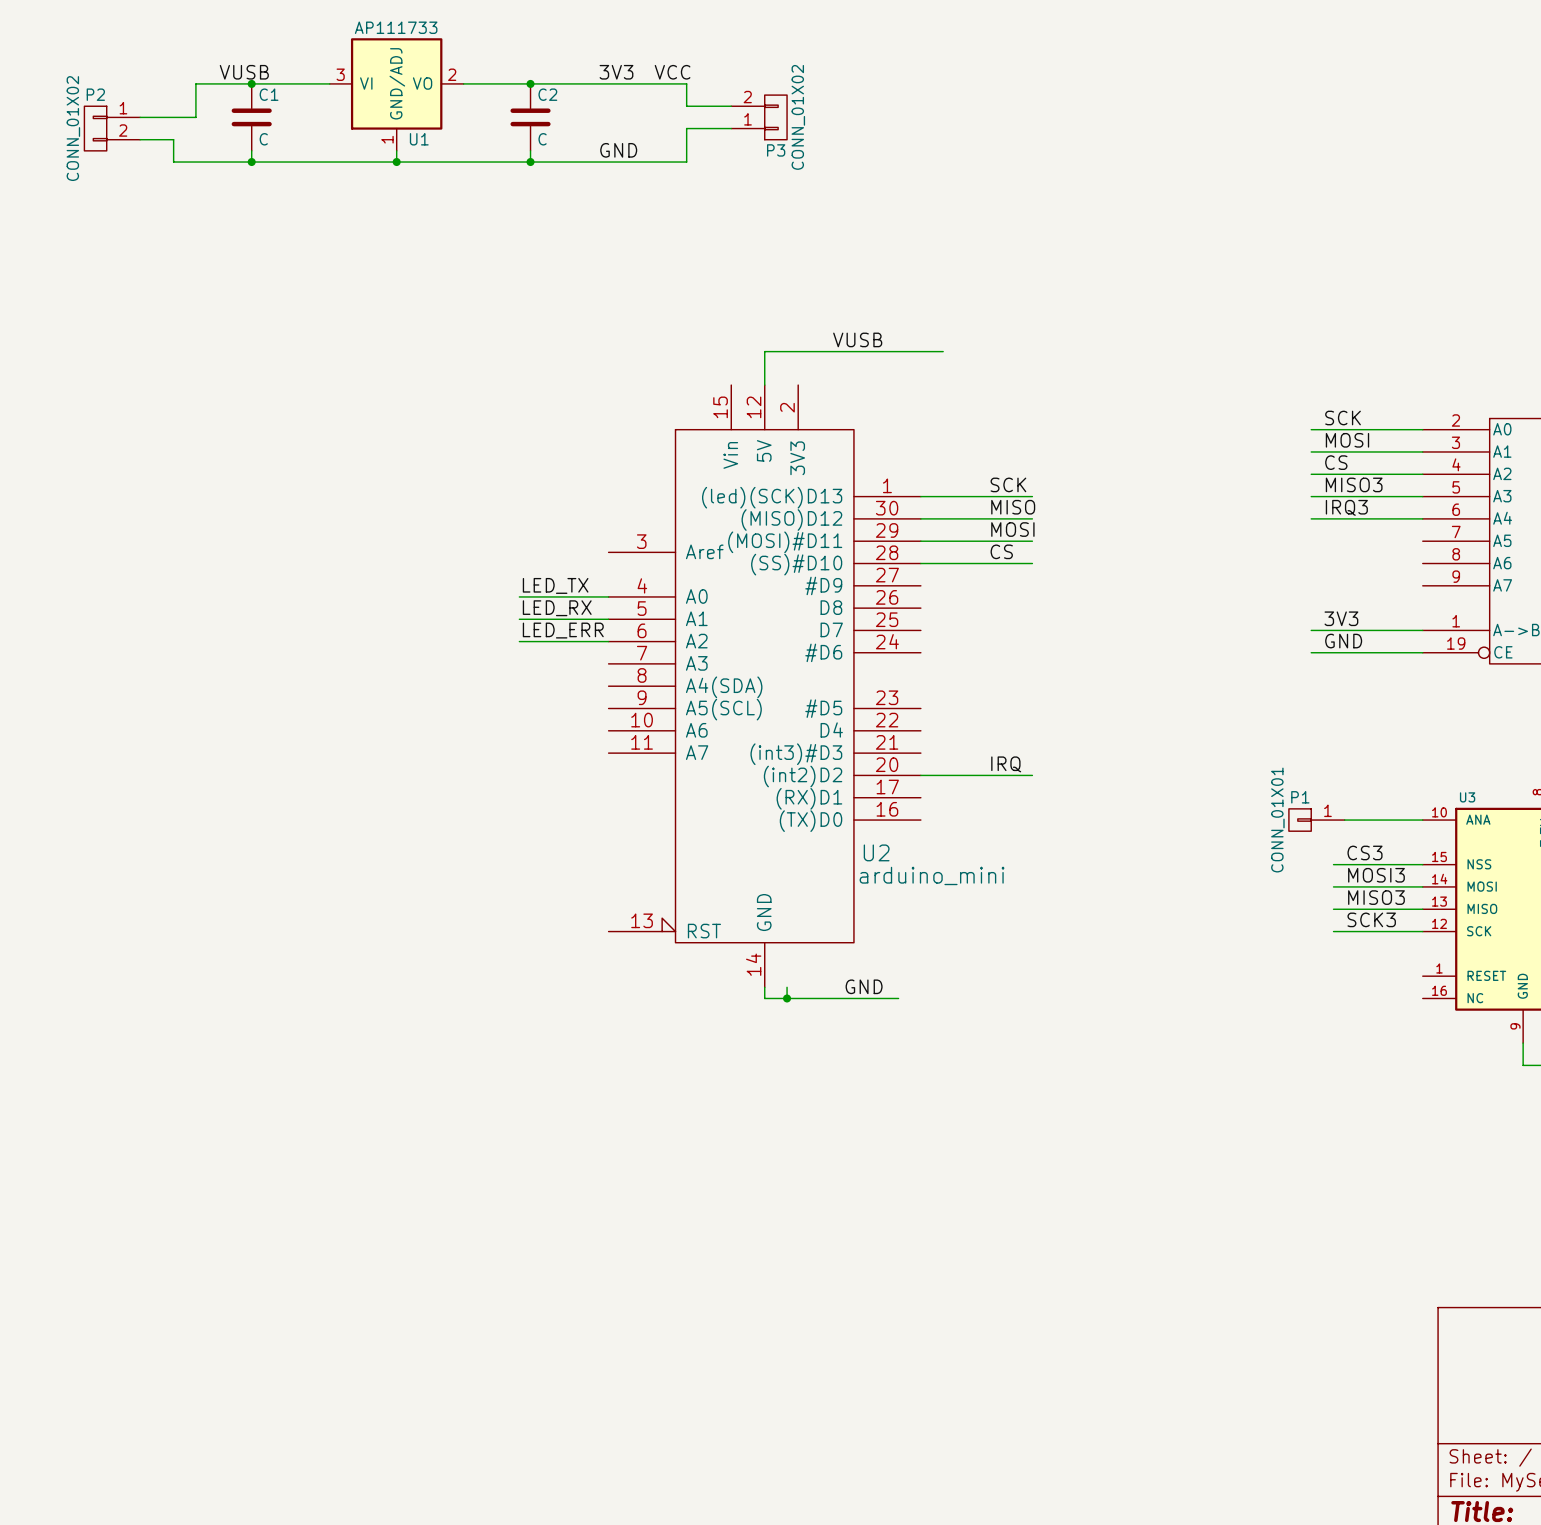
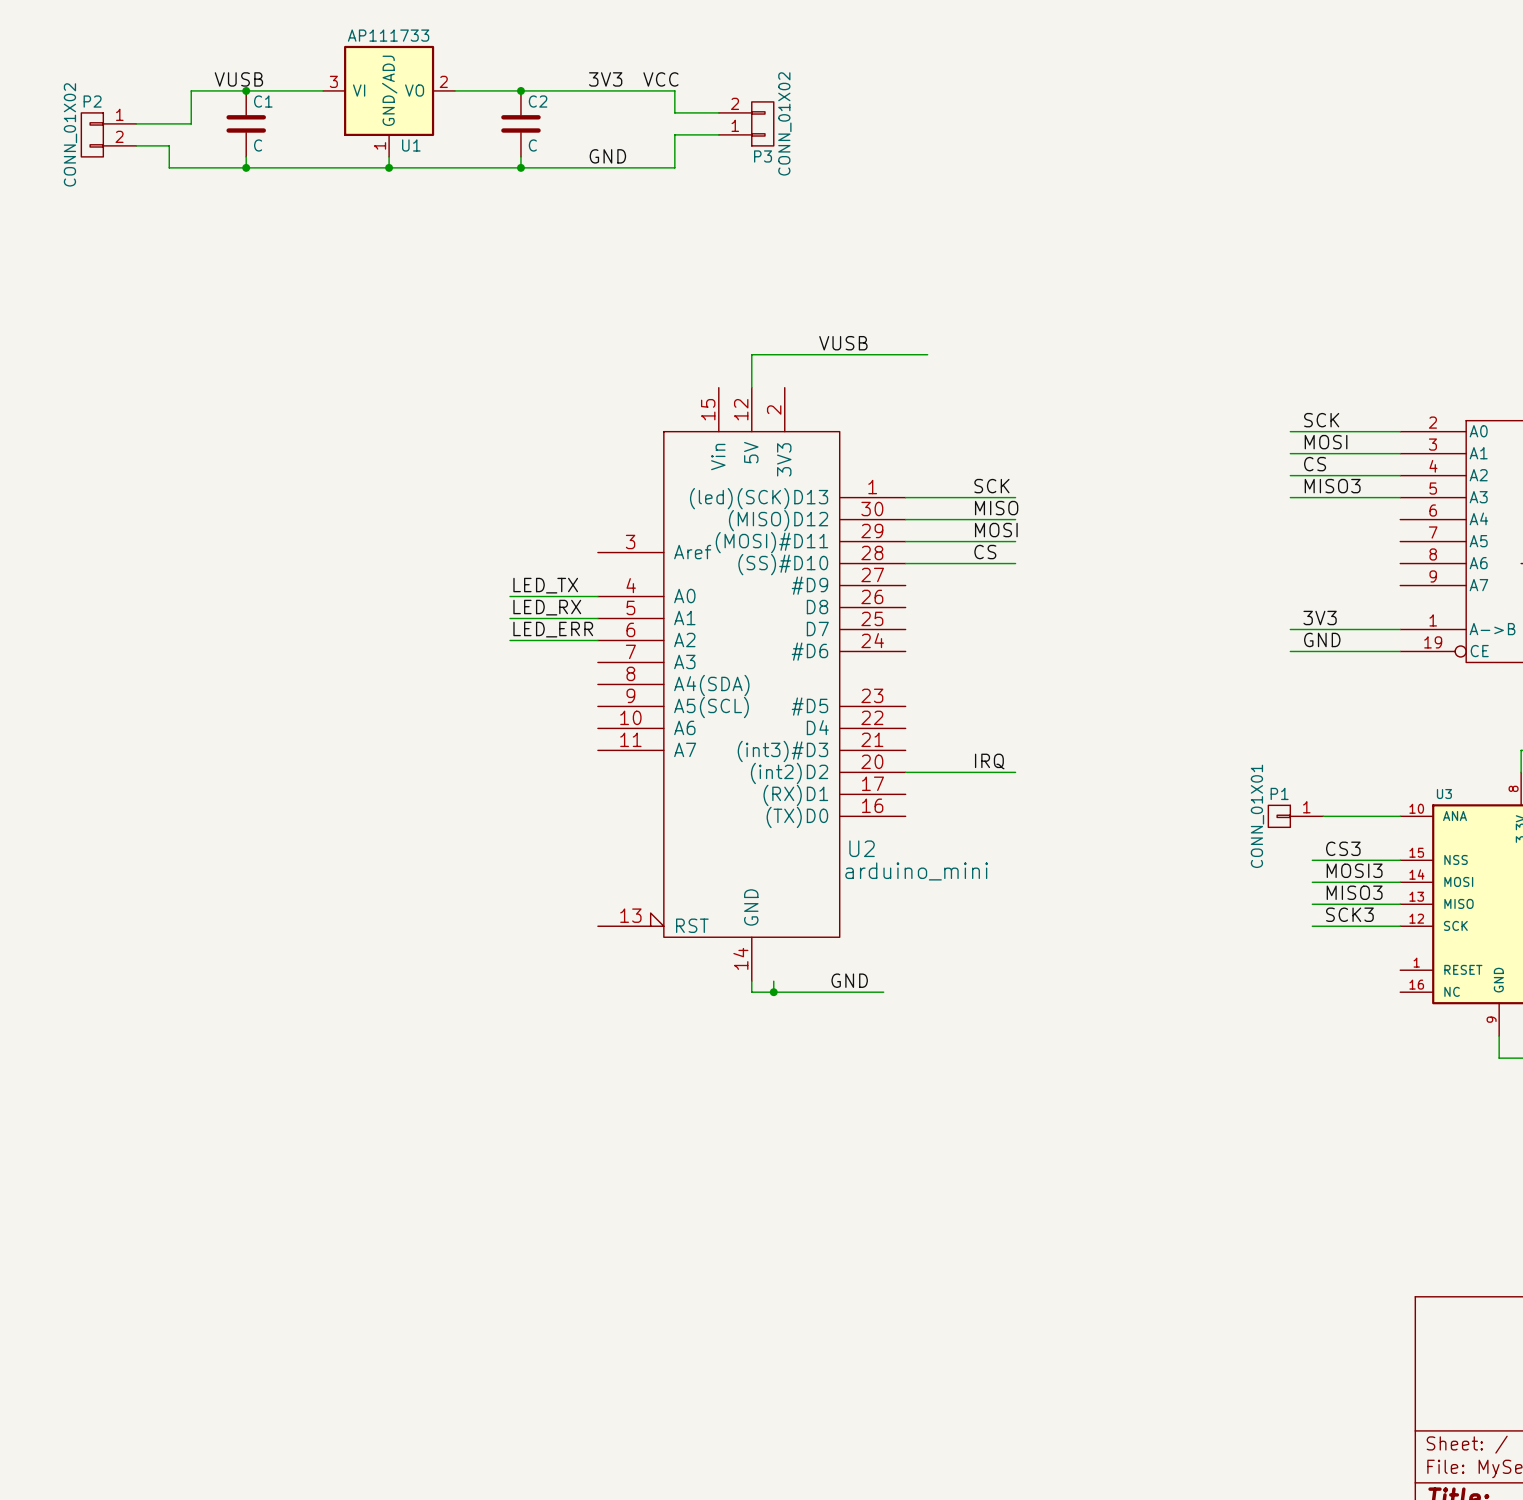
label: IRQ3 (1346, 507) -> none
wire: (1311, 518) (1422, 518) -> none

